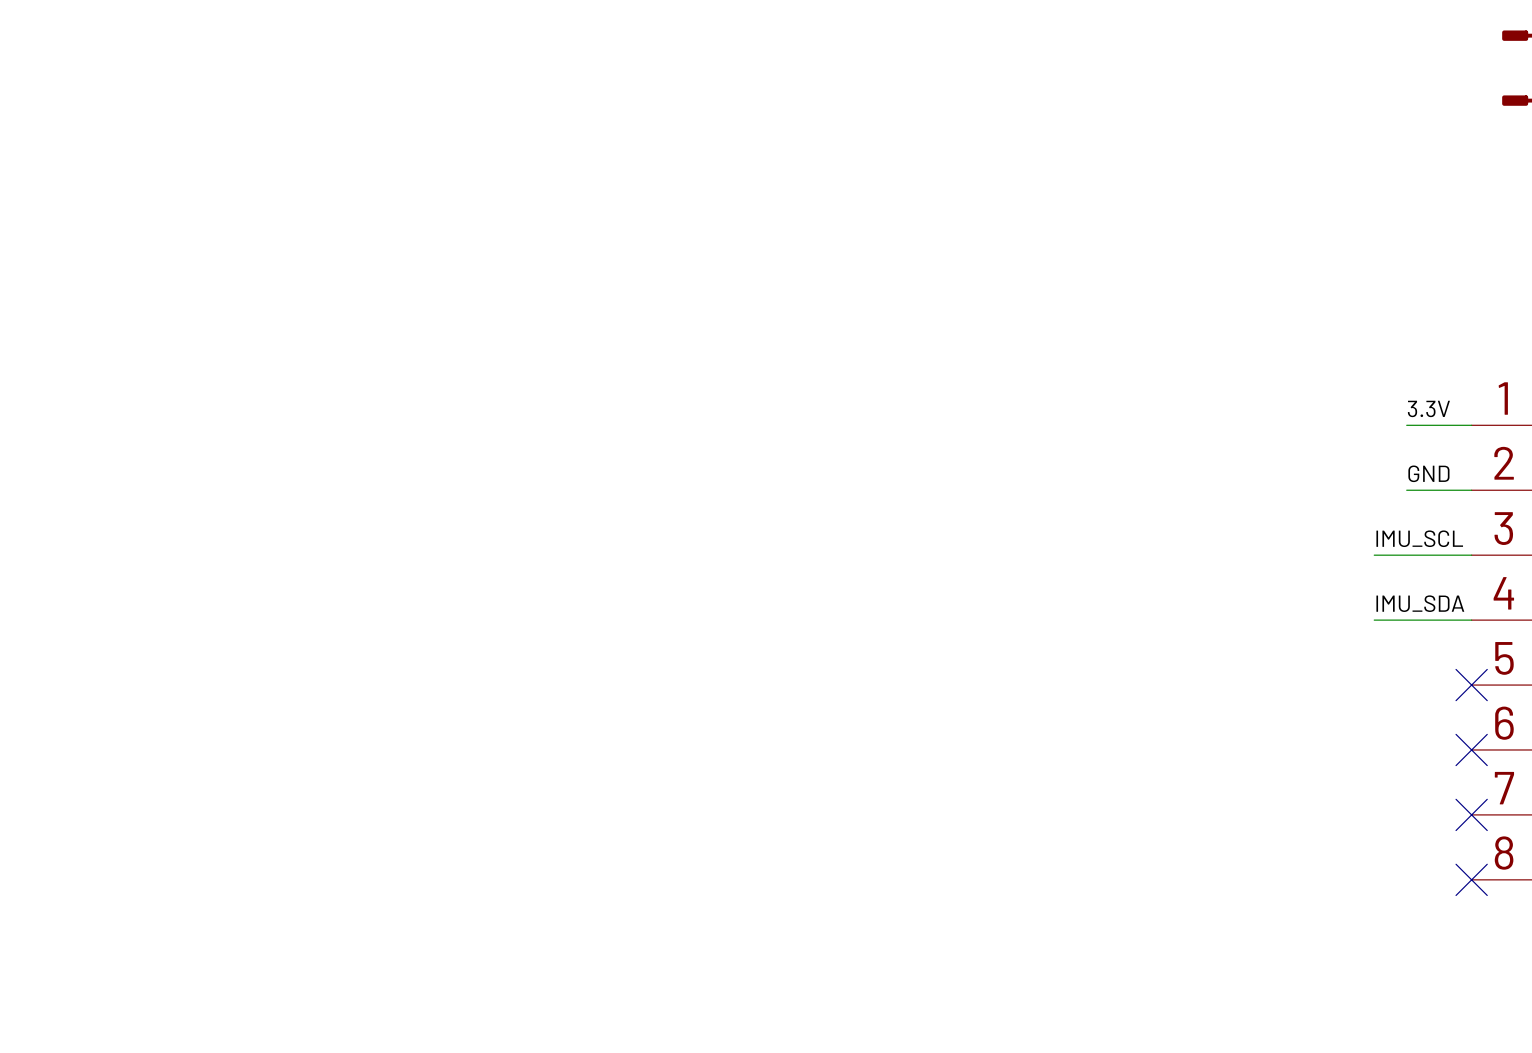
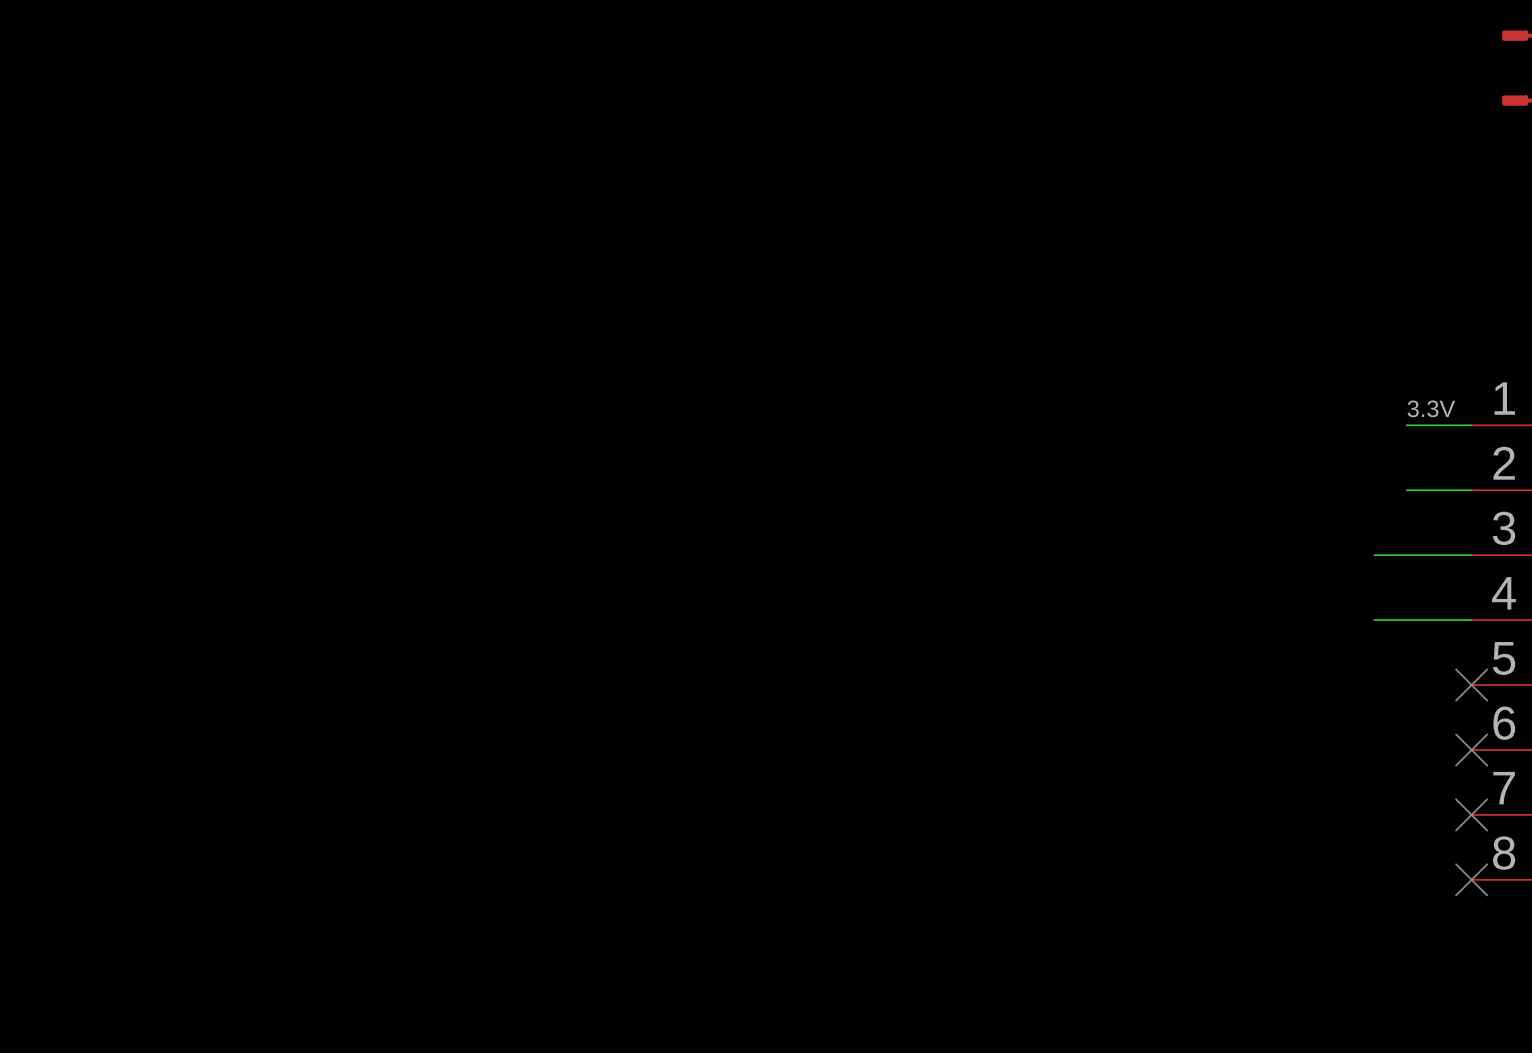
label: GND (1428, 473) -> none
label: IMU_SCL (1419, 538) -> none
label: IMU_SDA (1420, 603) -> none

